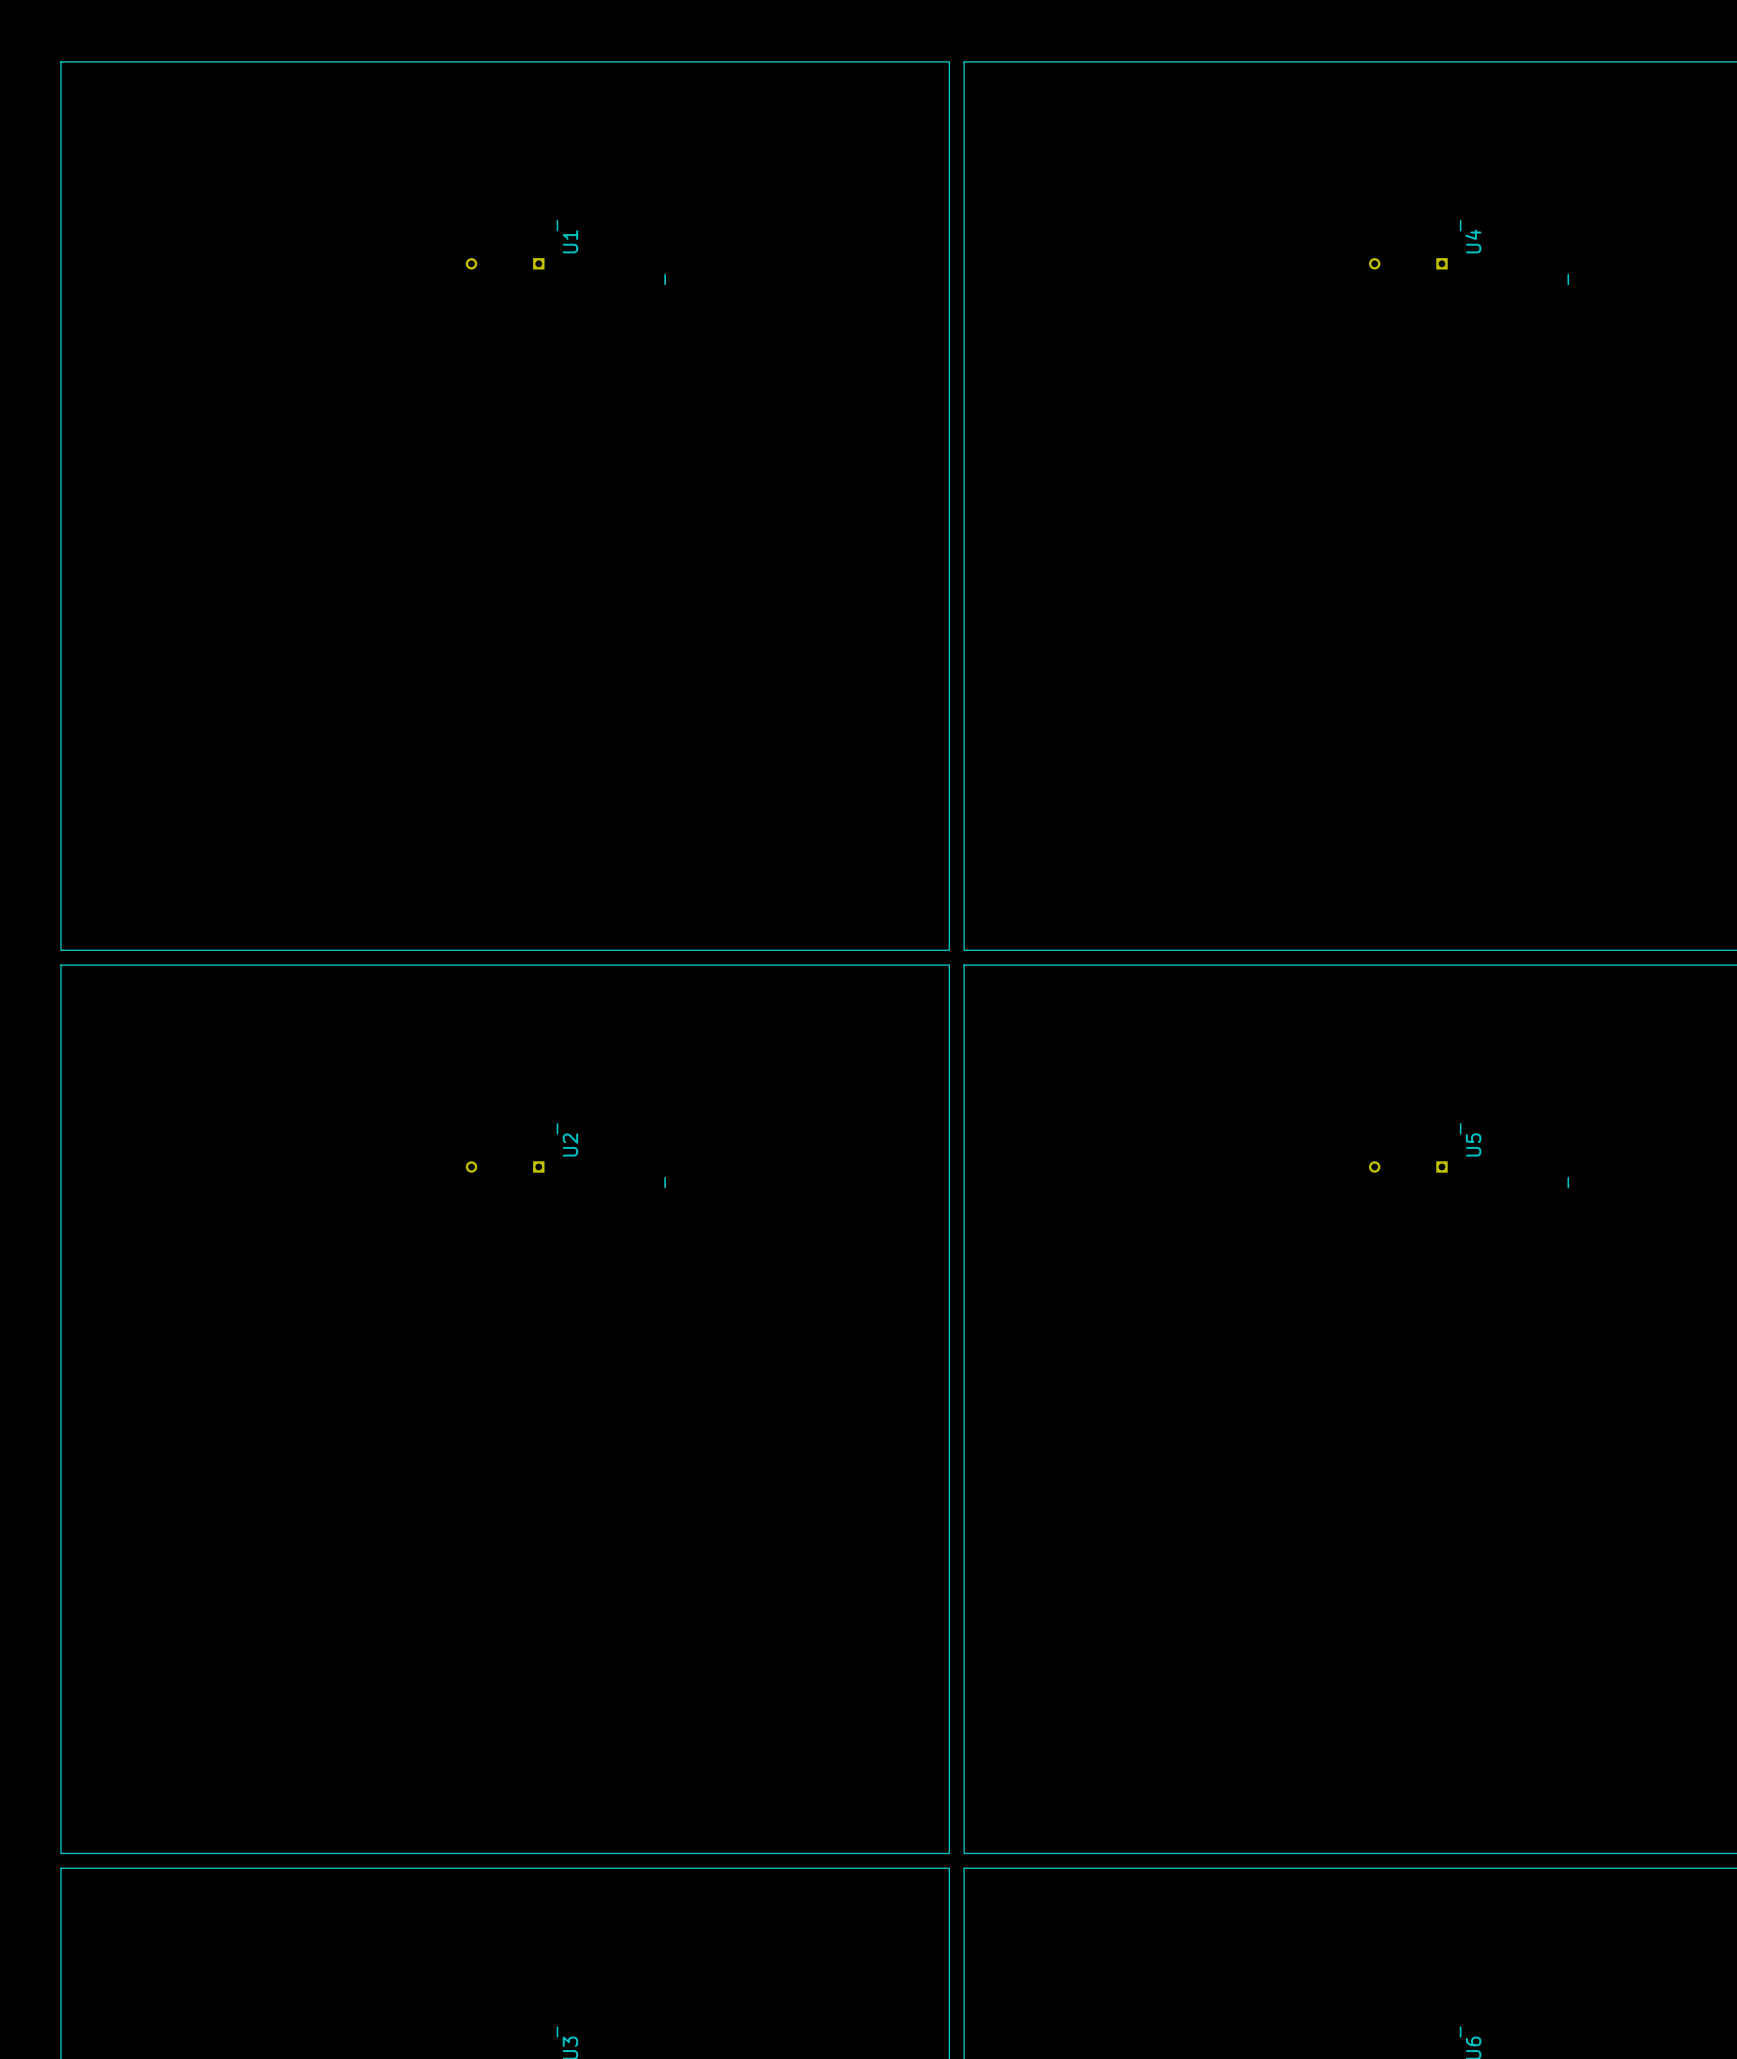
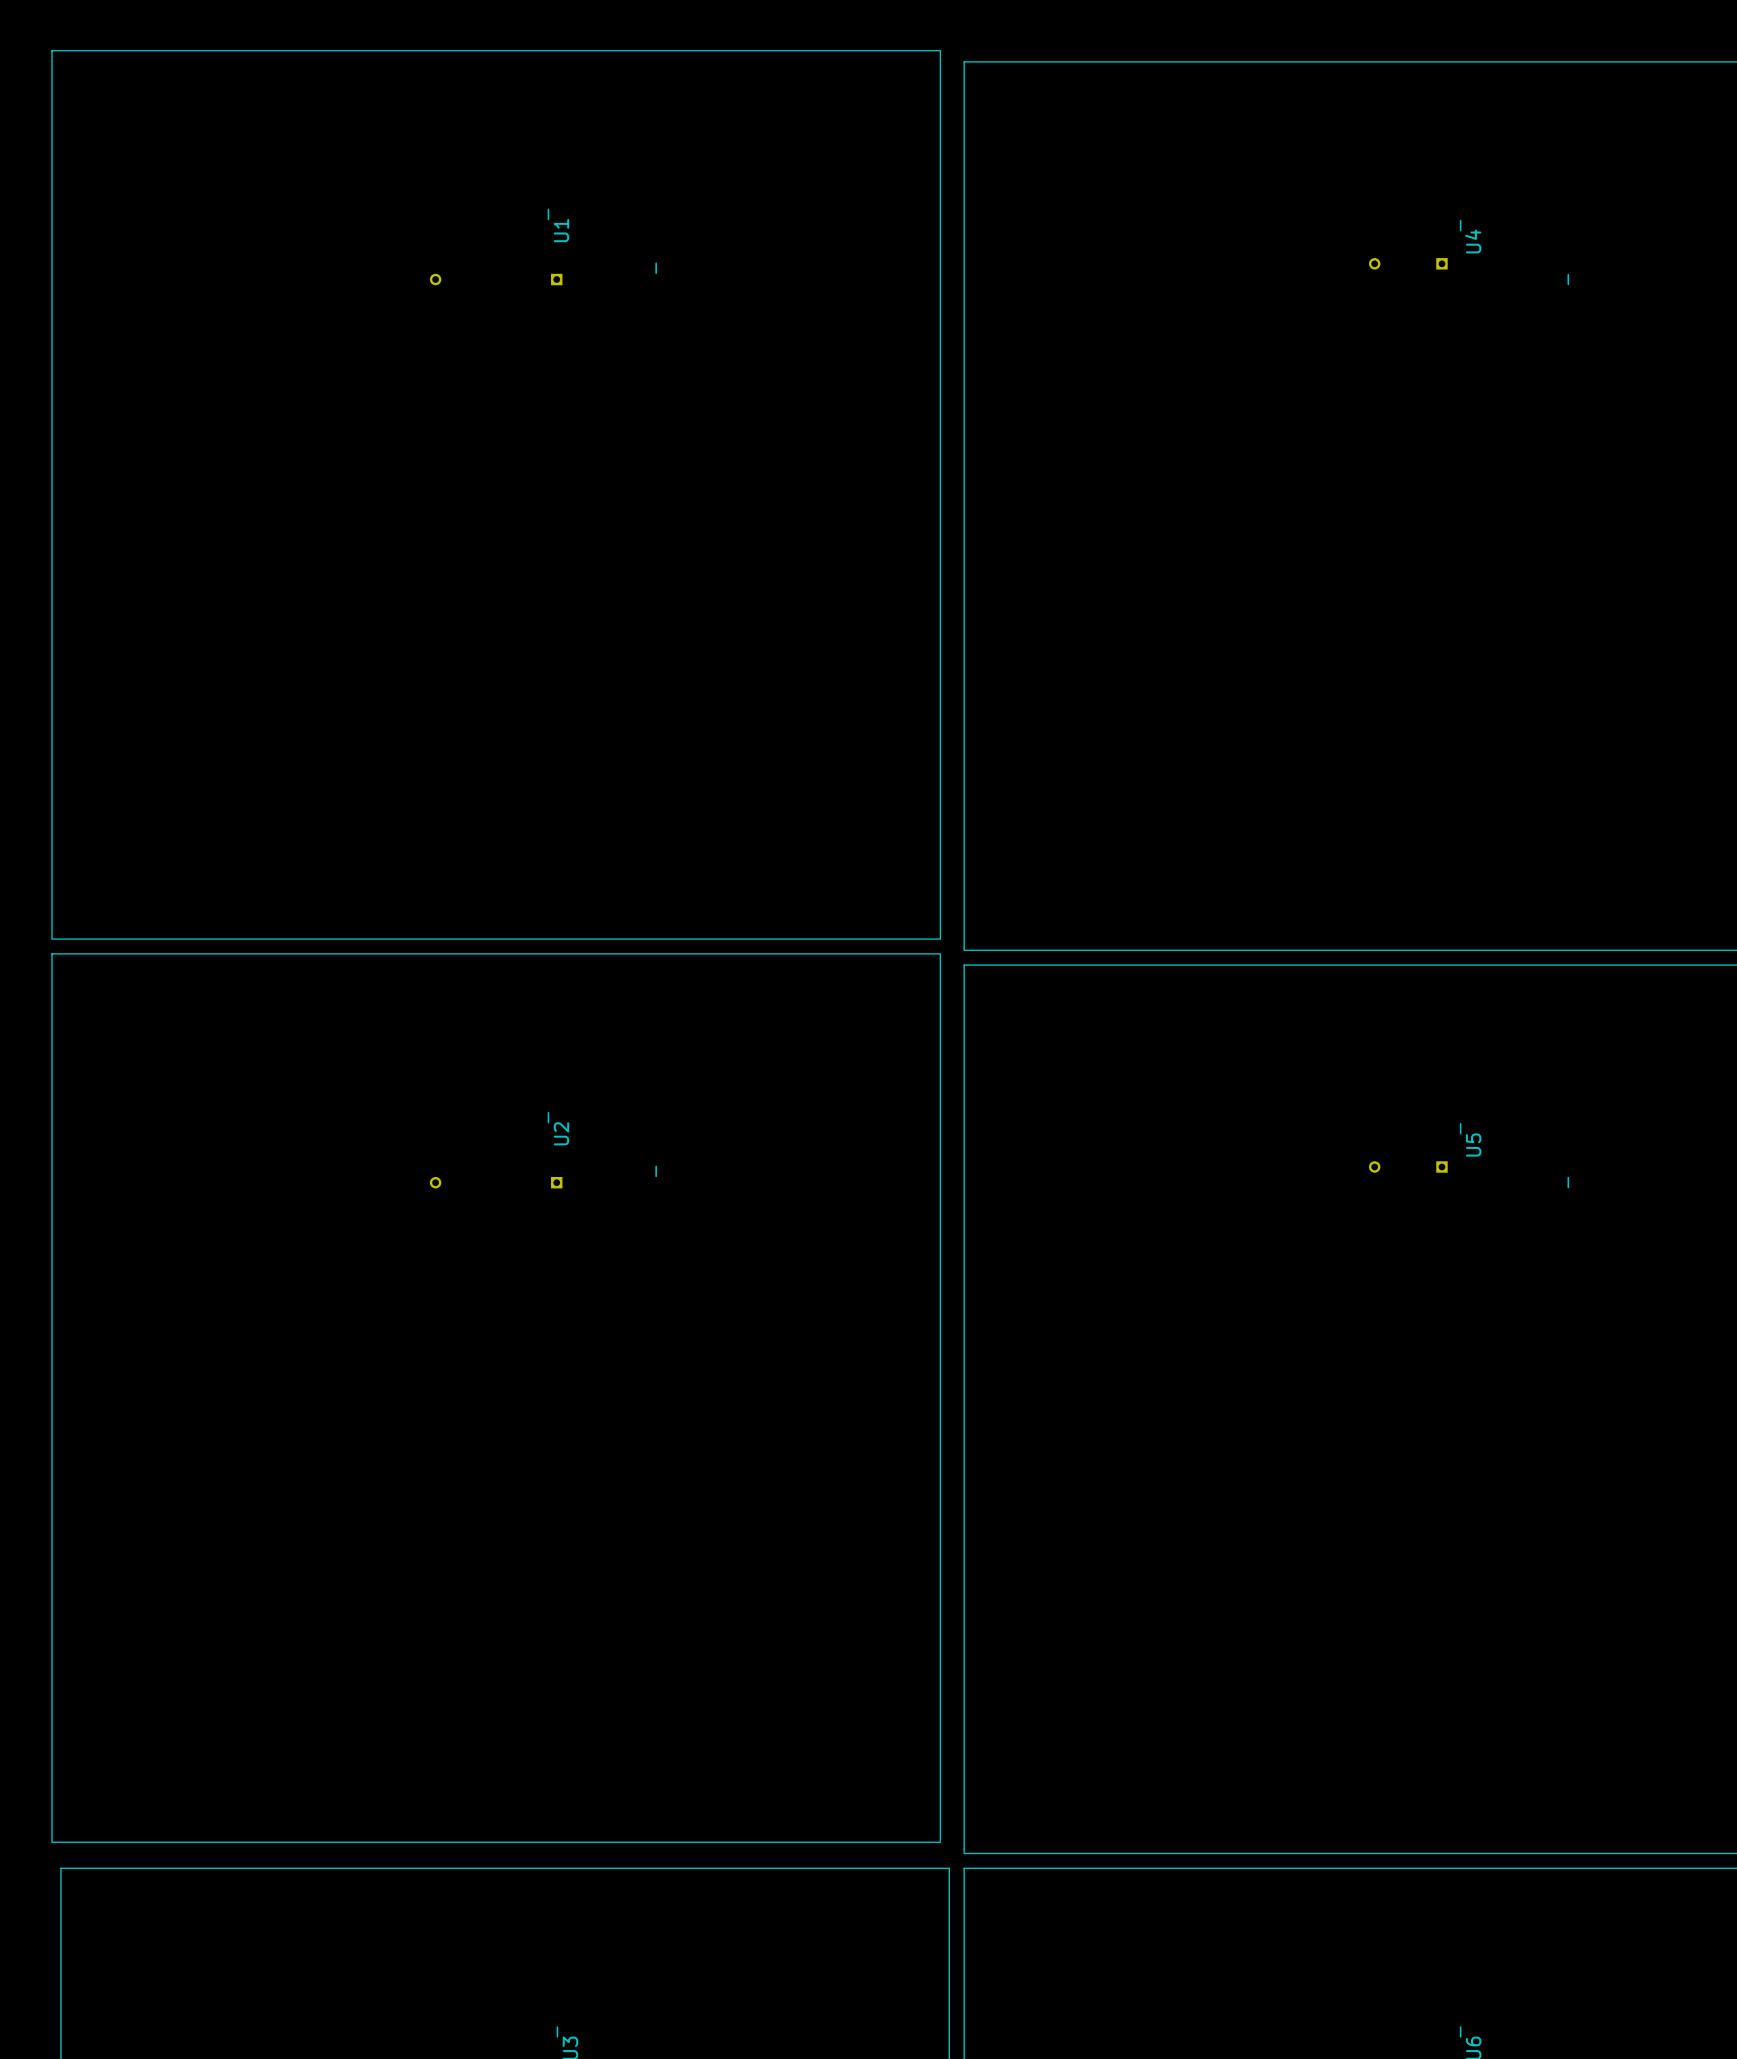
U1 footprint: [60, 61, 951, 951] -> [51, 50, 942, 940]
U2 footprint: [60, 964, 951, 1855] -> [51, 953, 942, 1843]

